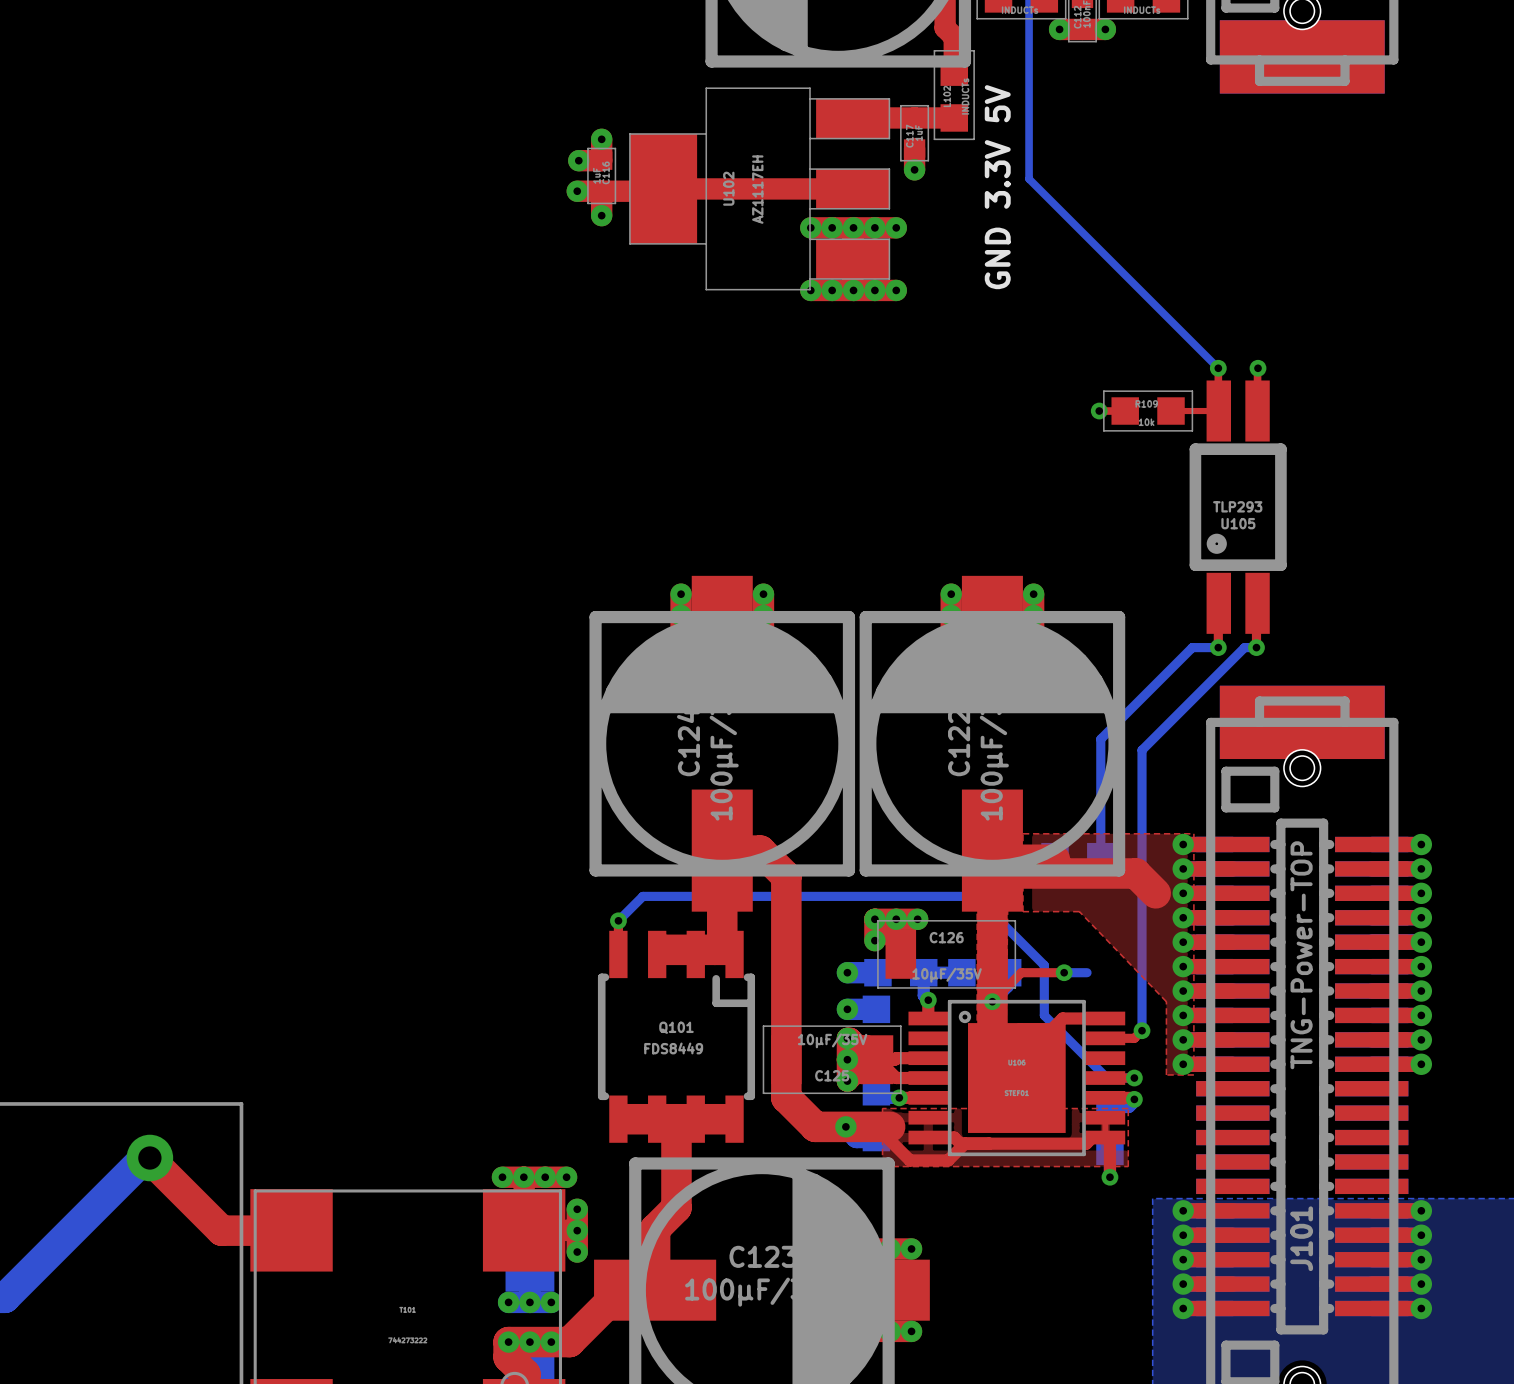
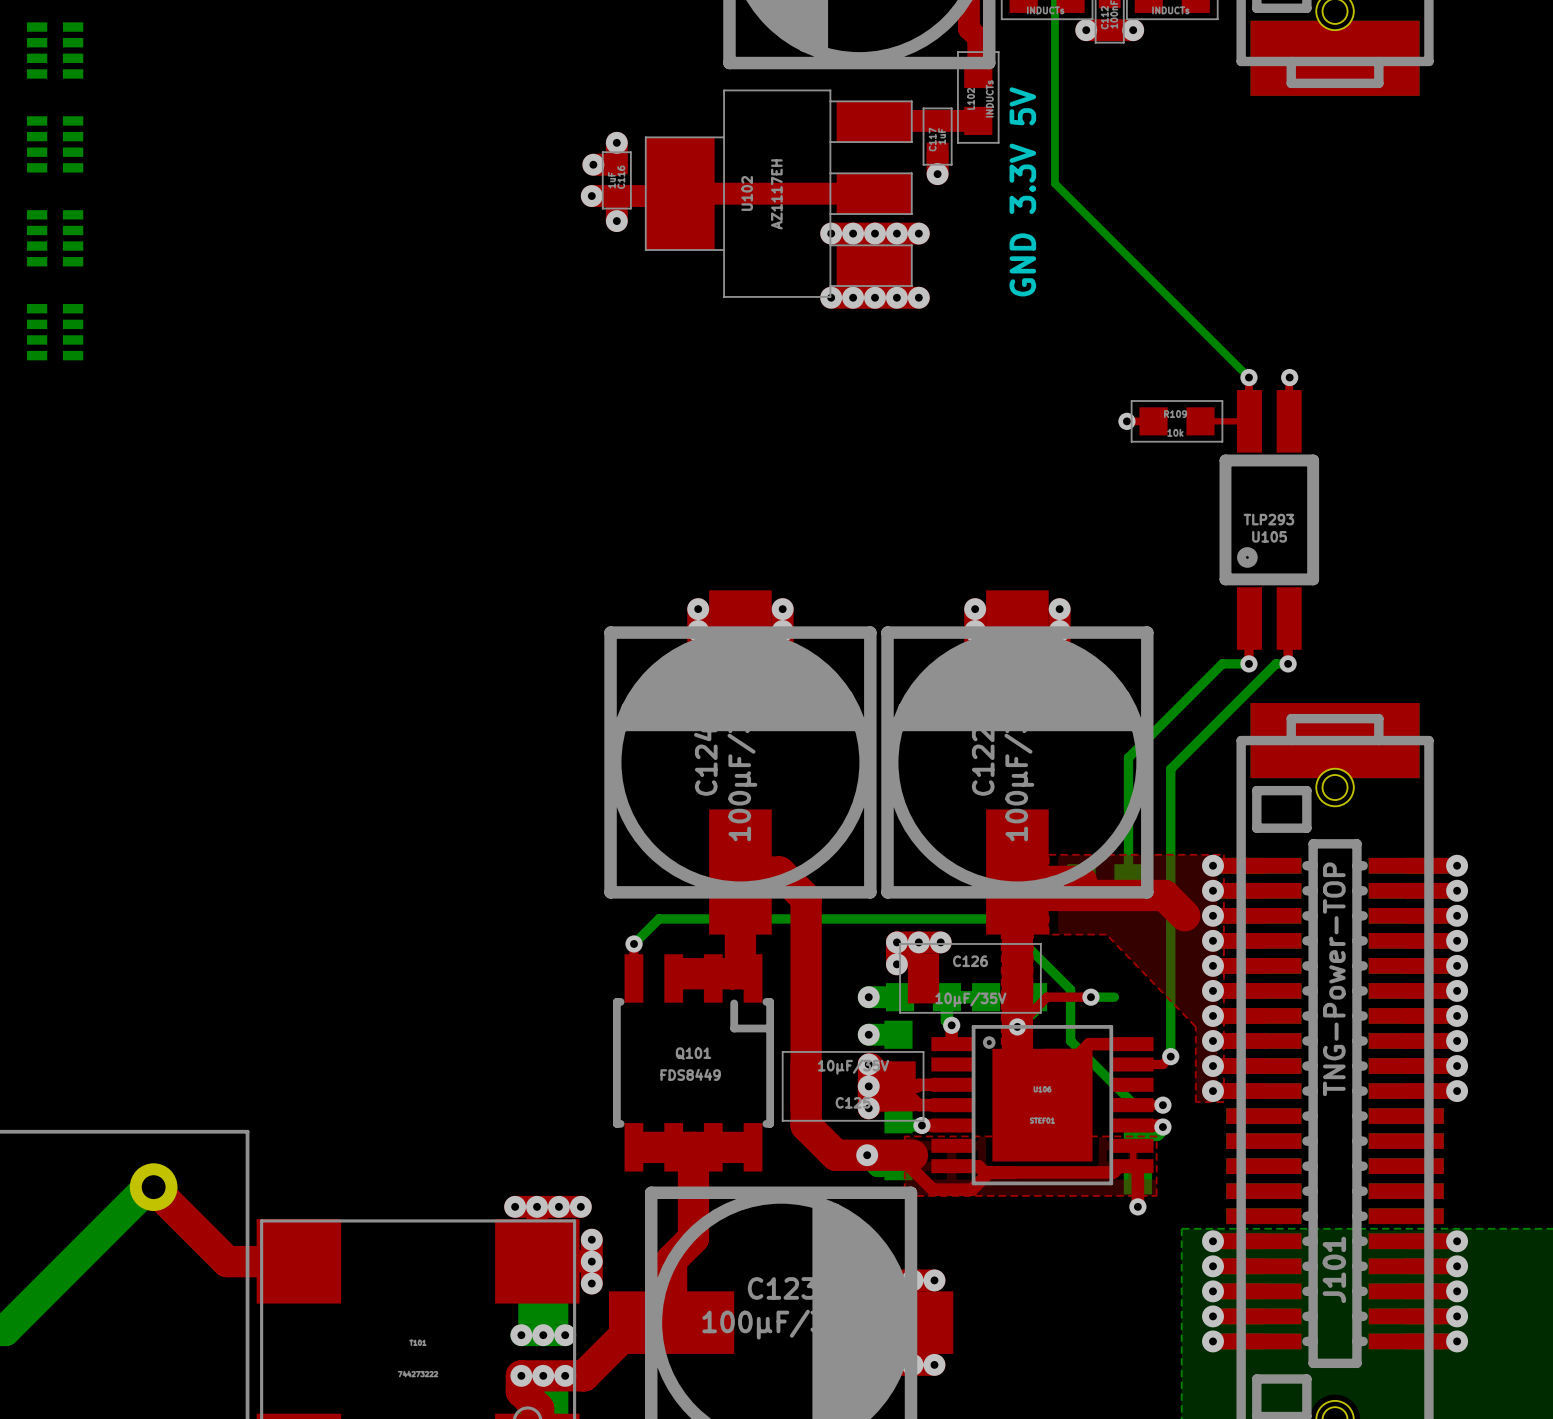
part: none -> (55, 50)
part: none -> (55, 144)
part: none -> (55, 238)
part: none -> (55, 332)

